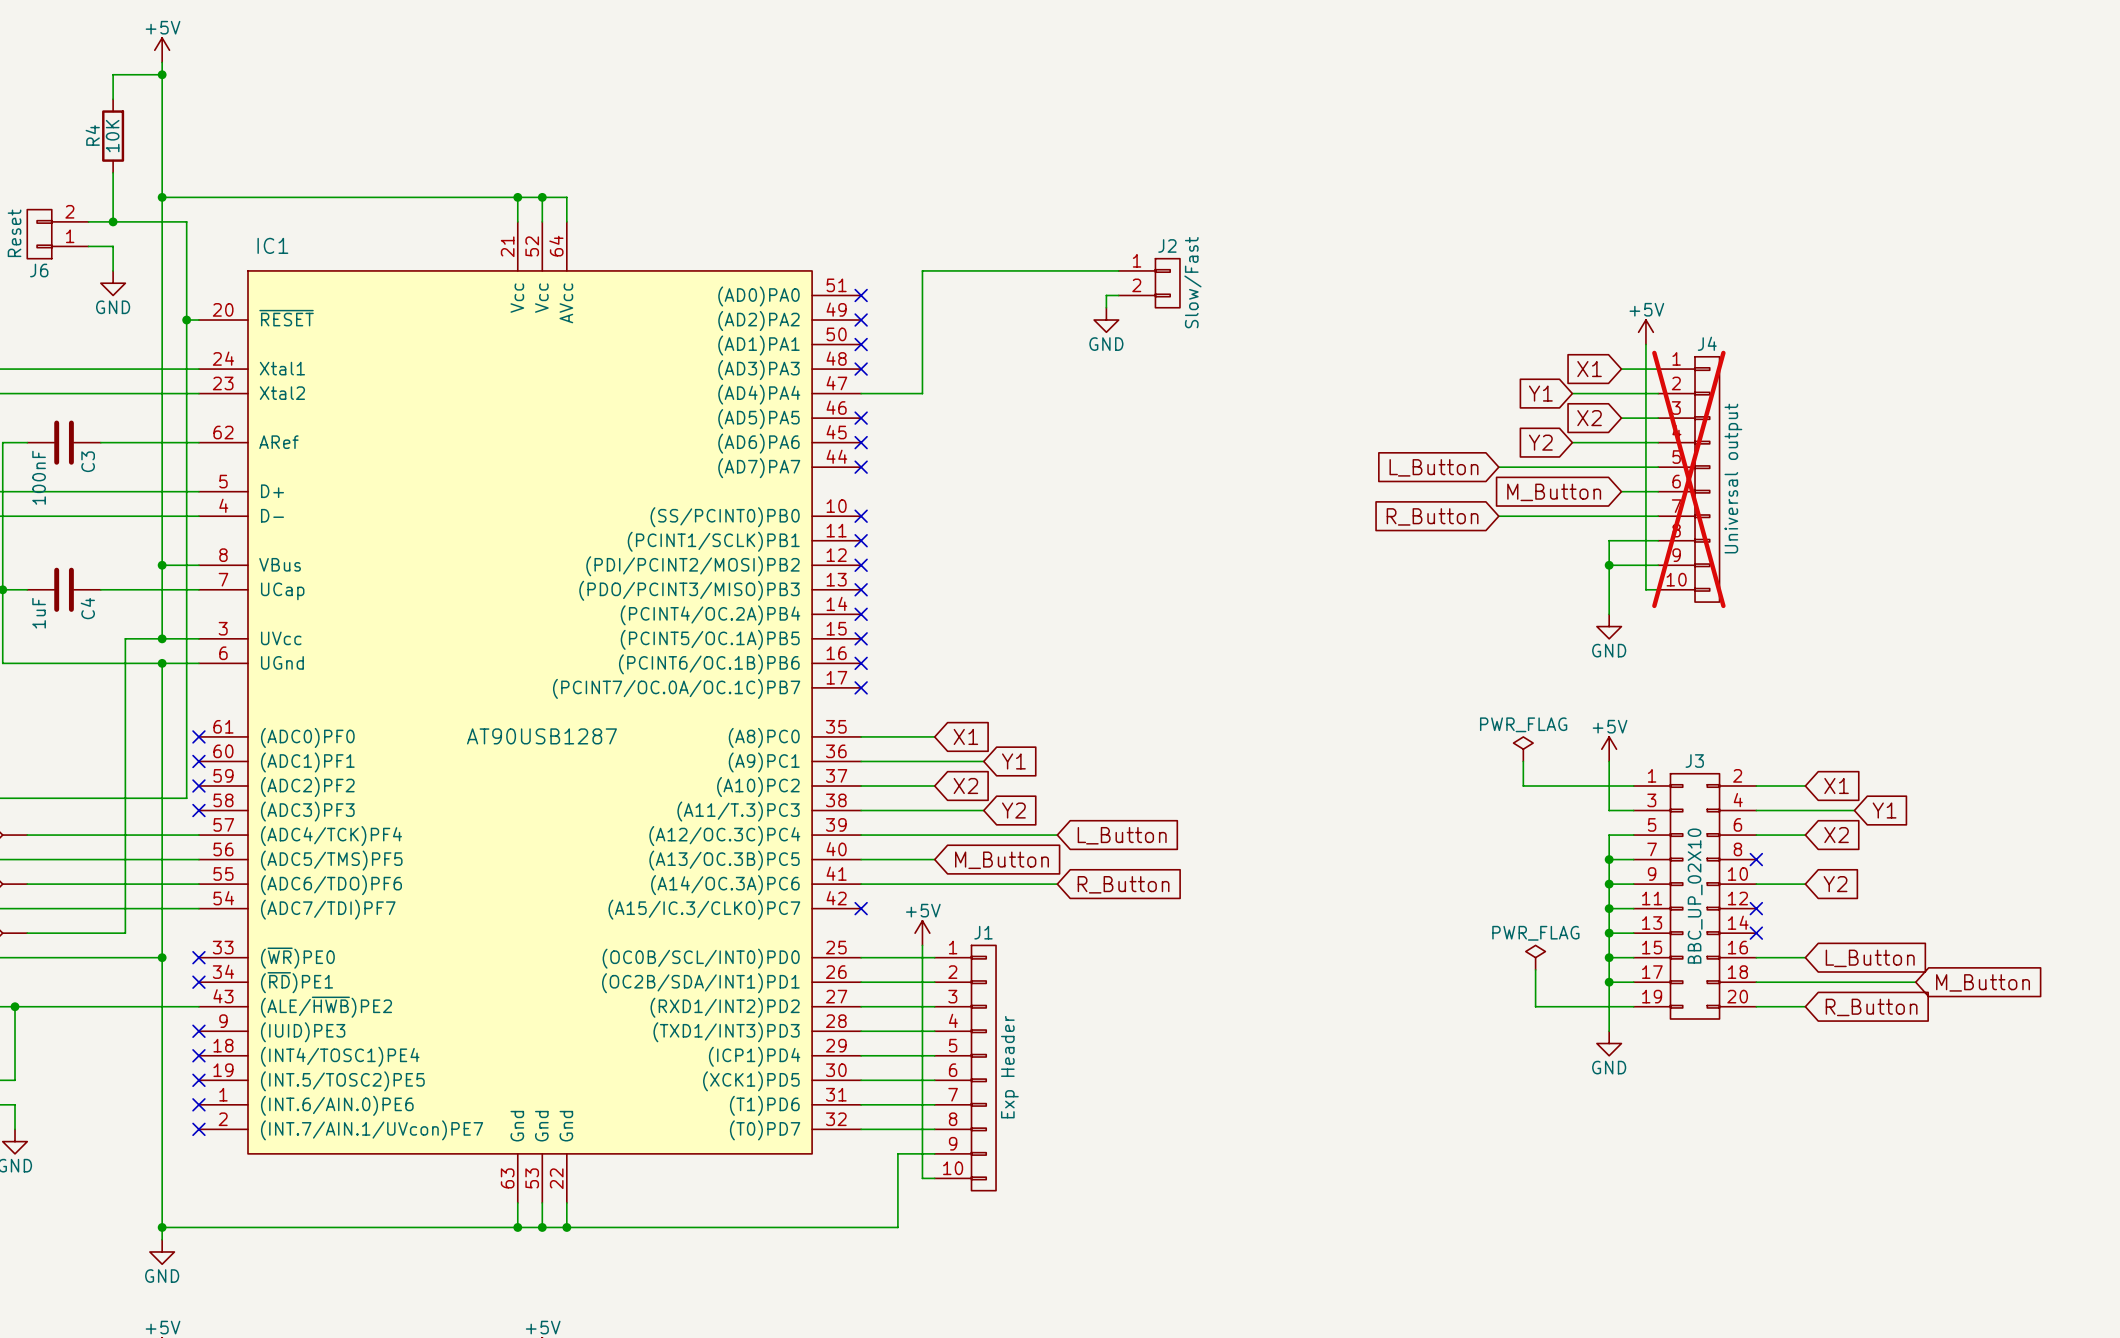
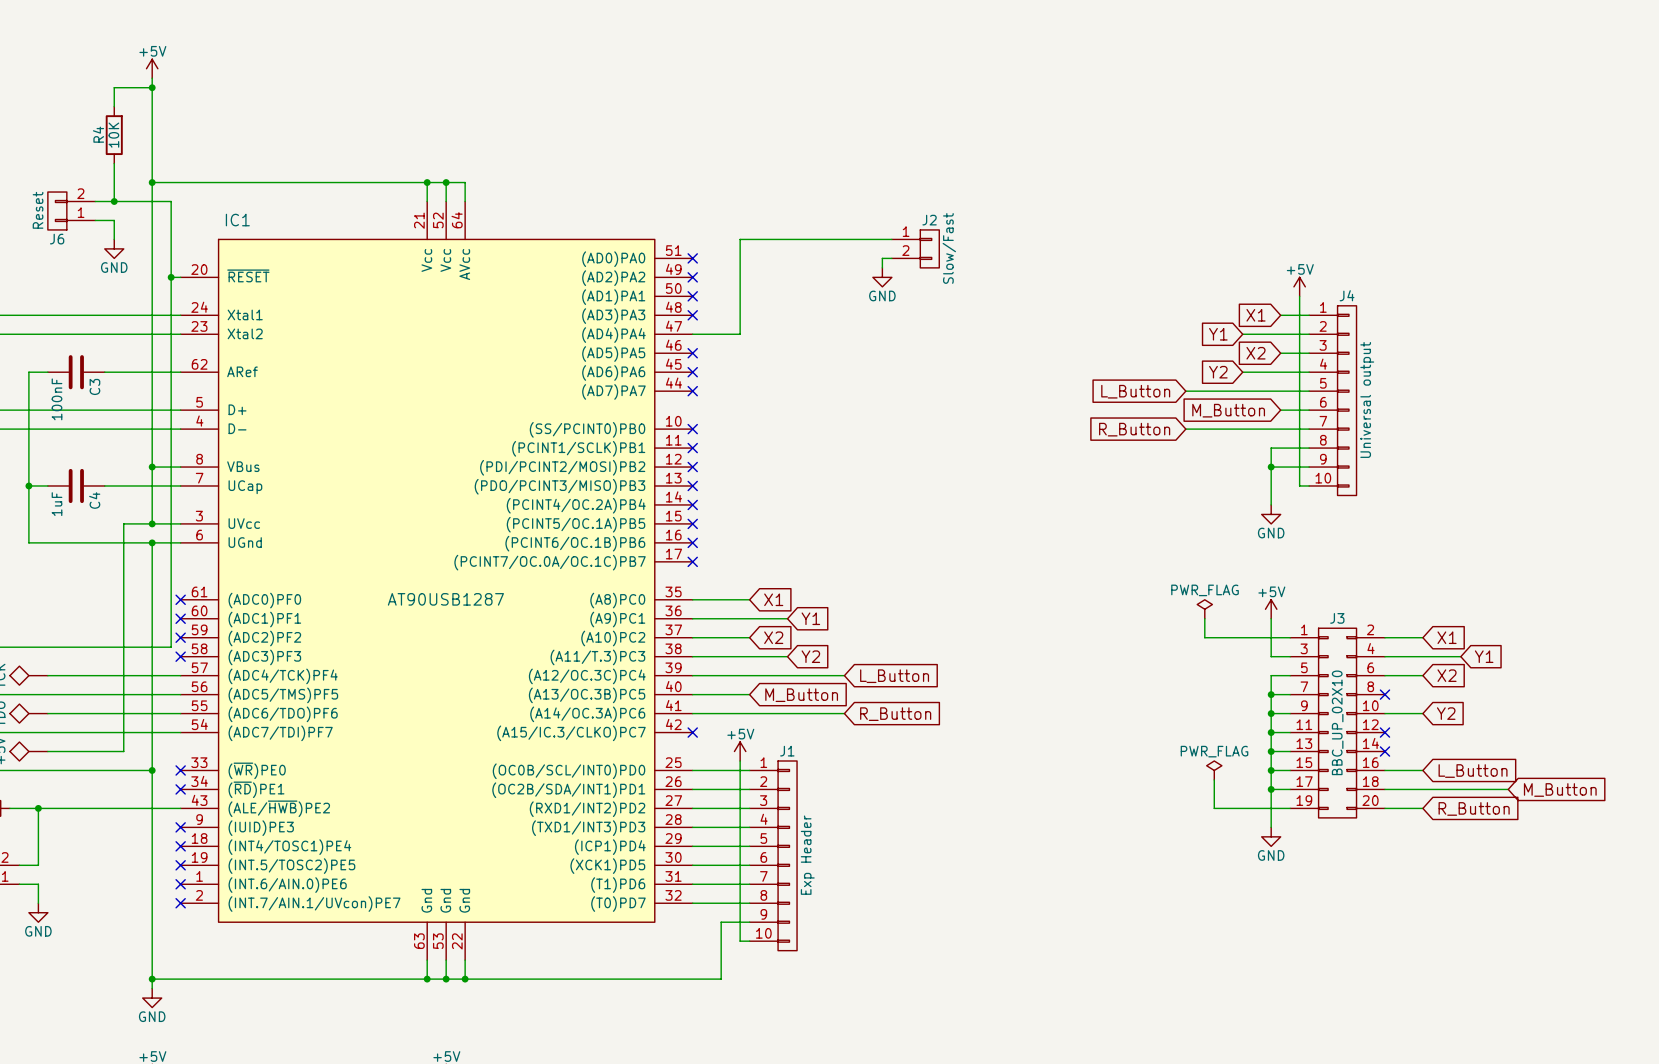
J4 do-not-place cross: (1688, 479) -> none

